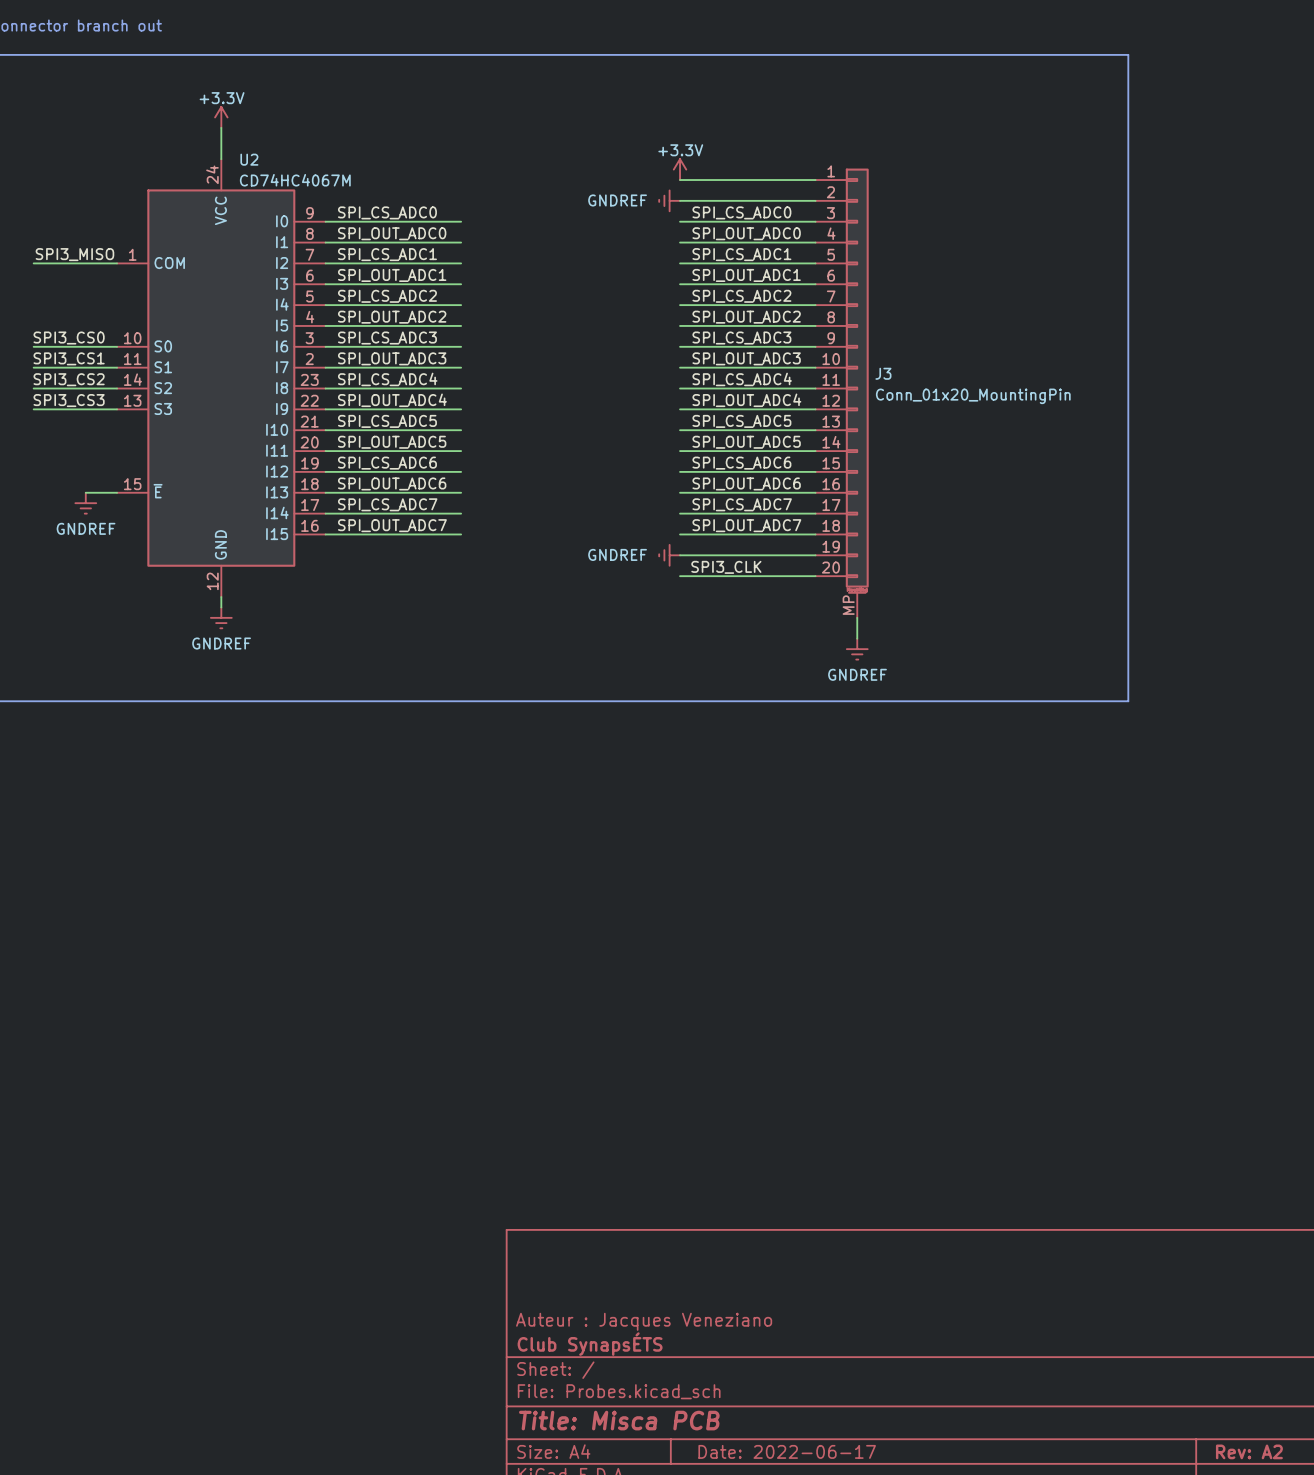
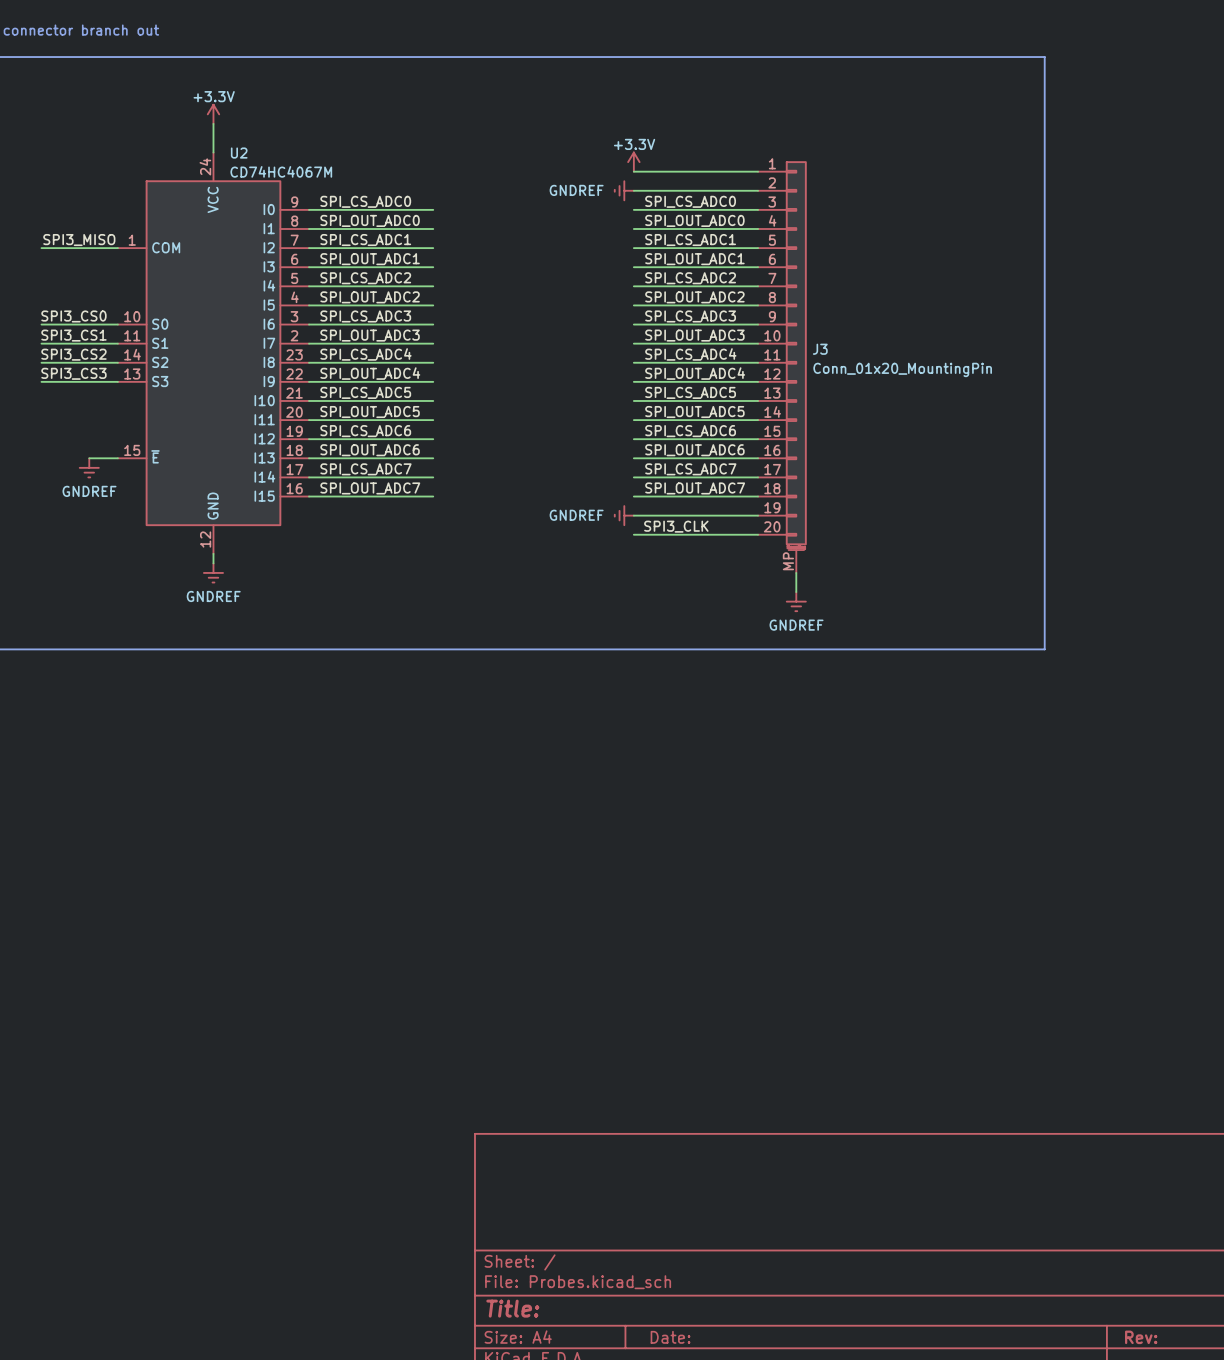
title block: Auteur : Jacques Veneziano (644, 1321) -> none
title block: Club SynapsÉTS (590, 1344) -> none
title block: Title: Misca PCB (619, 1420) -> Title: (512, 1308)
title block: Date: 2022-06-17 (787, 1451) -> Date: (670, 1337)
title block: Rev: A2 (1249, 1451) -> Rev: (1141, 1337)

